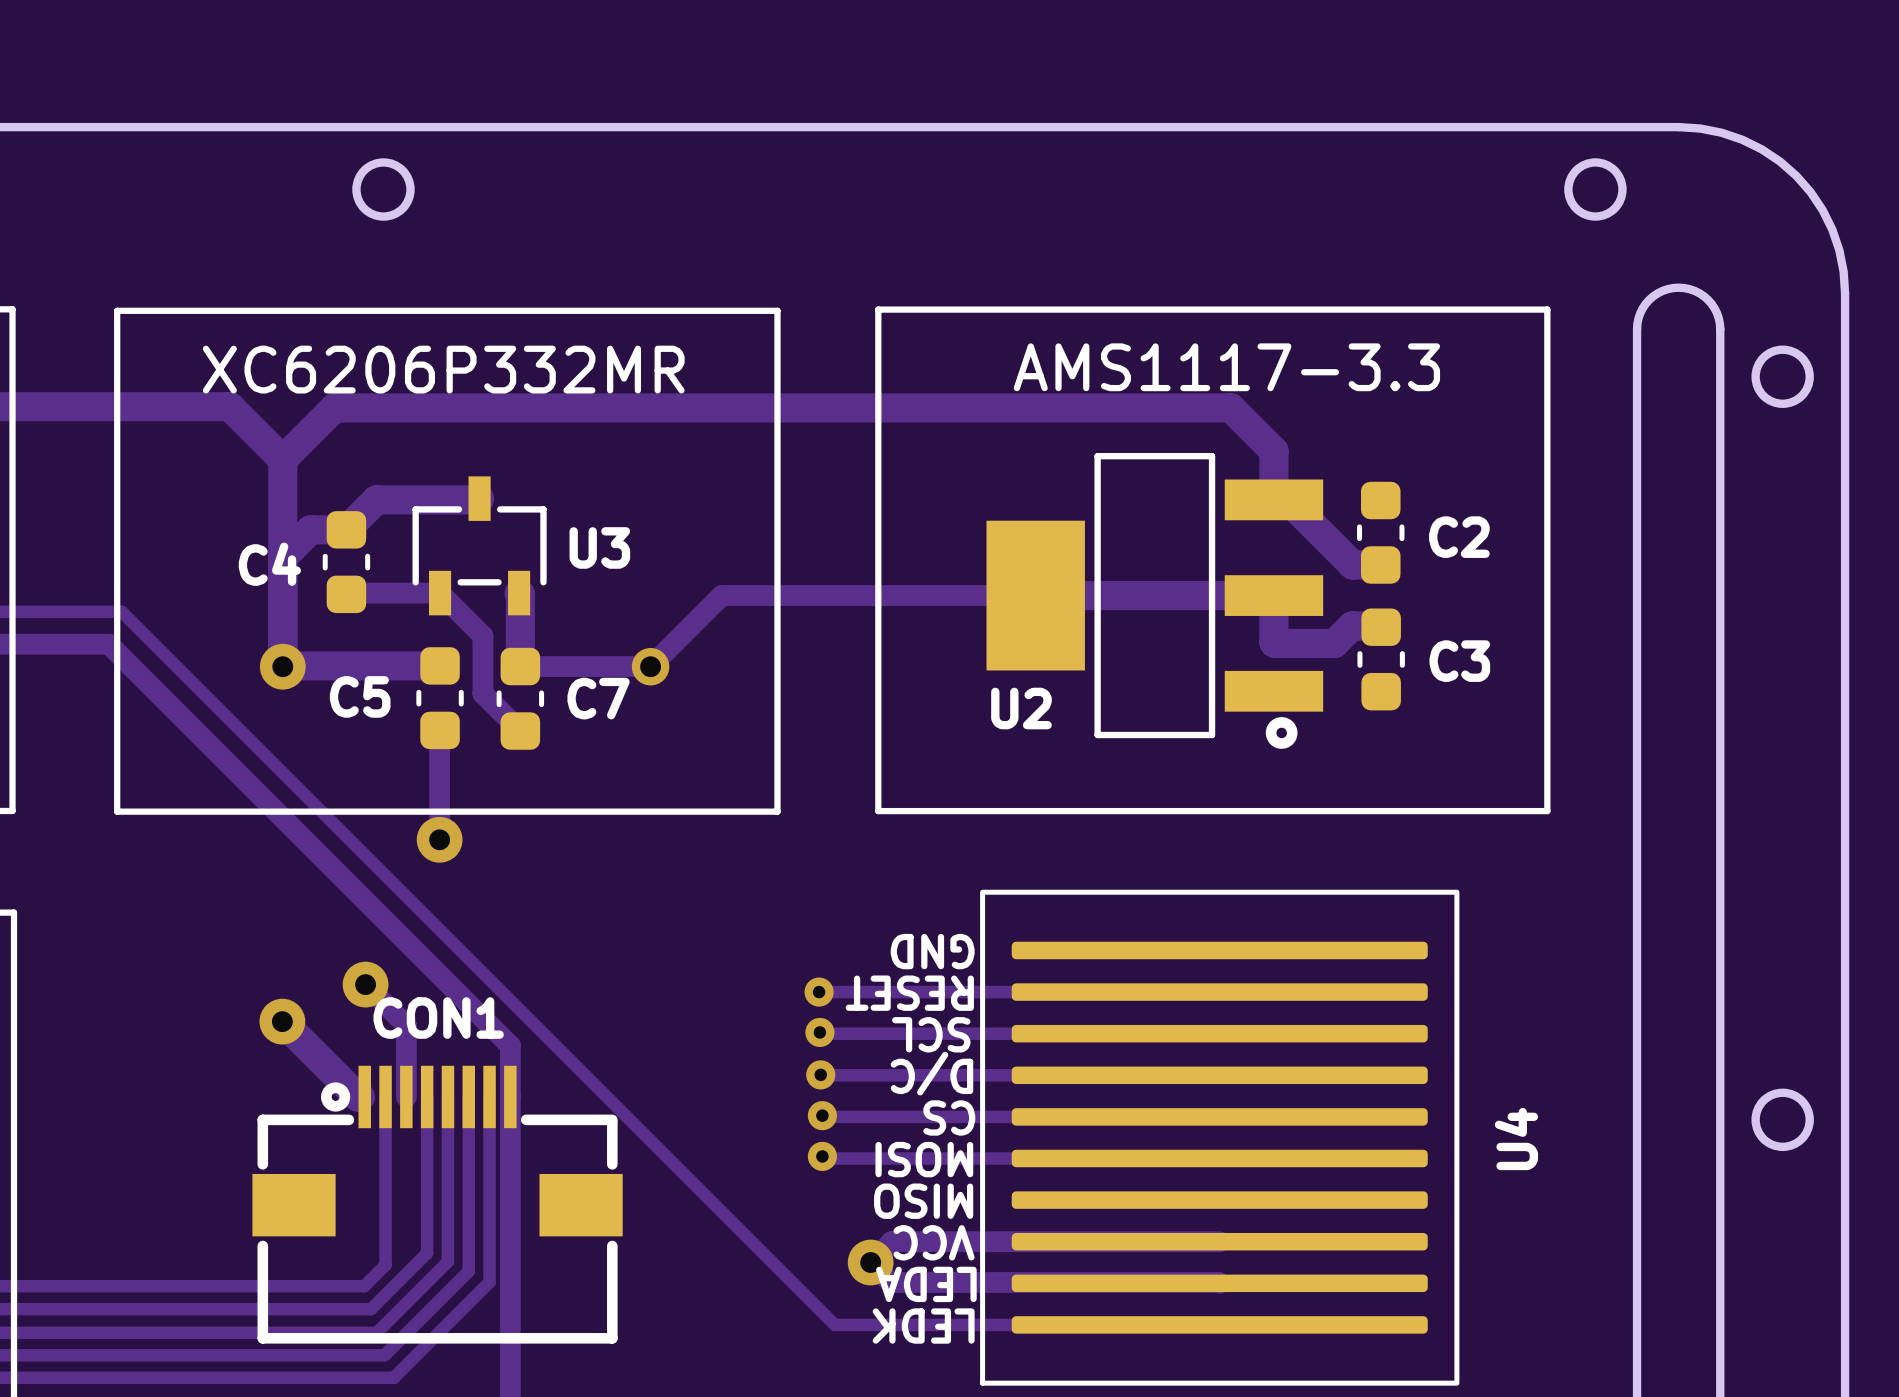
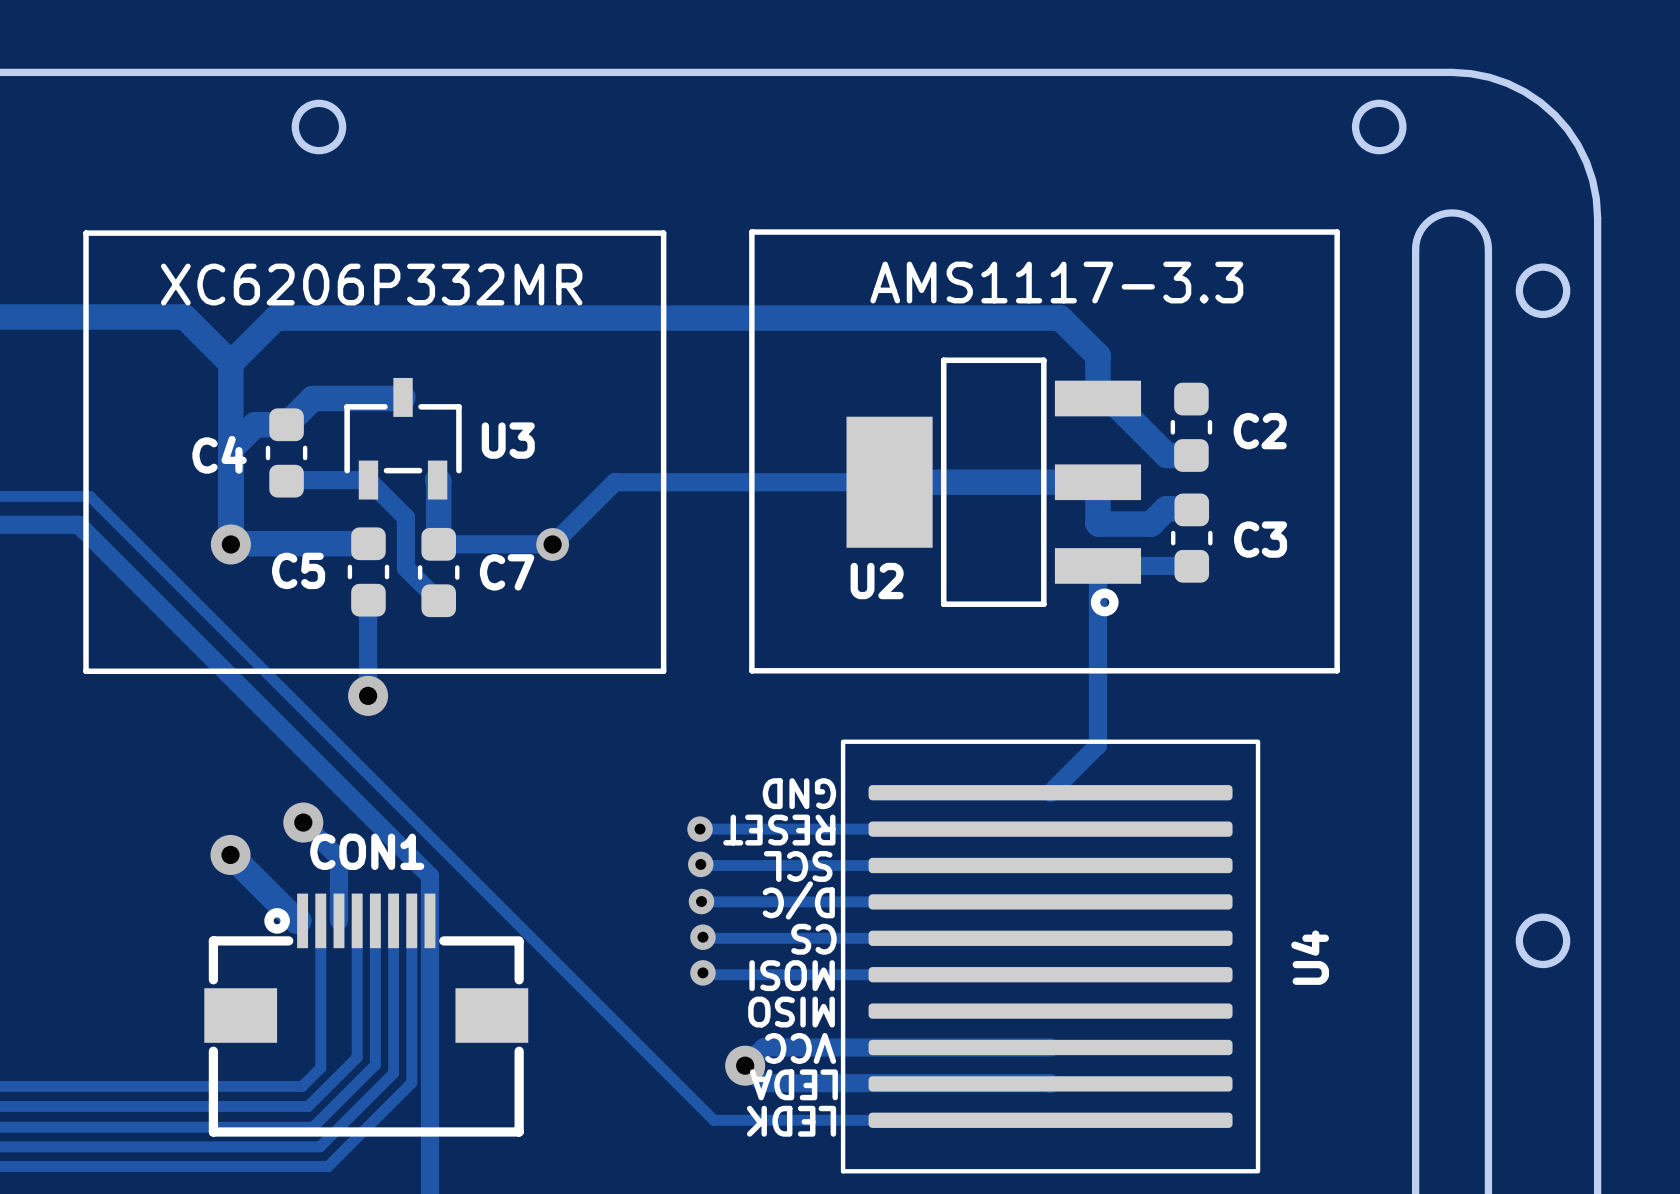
track: none -> (1191, 565) (1097, 565) (1097, 745) (1050, 792)

